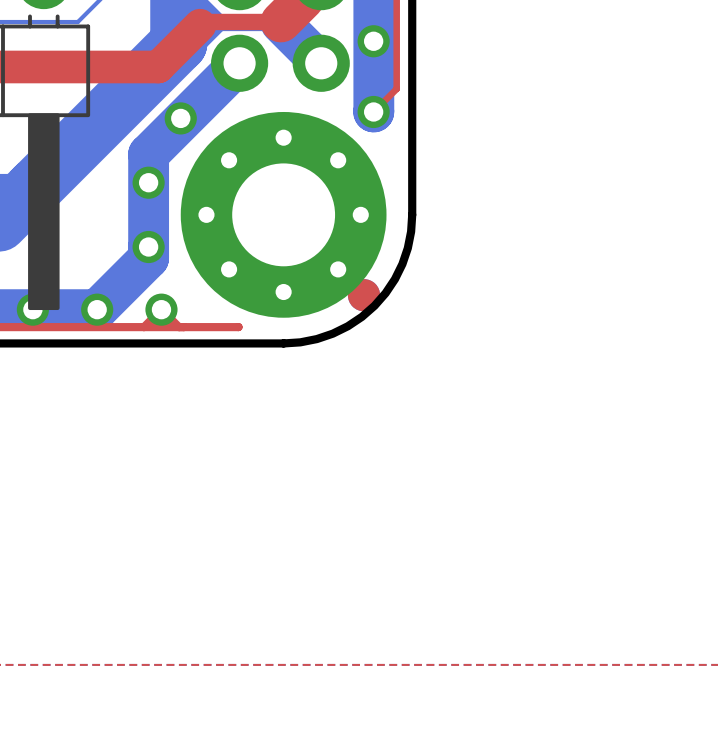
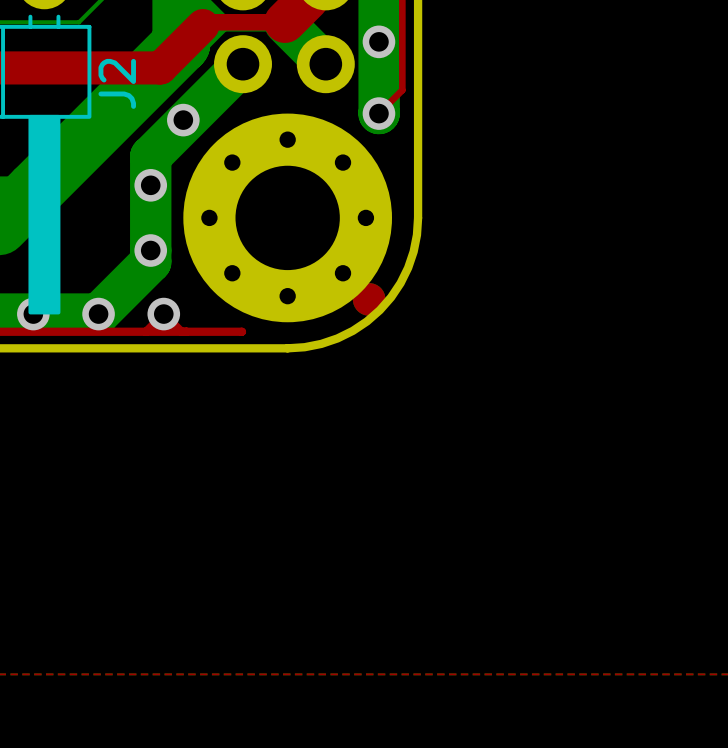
J2 name: none -> J2 (117, 83)

